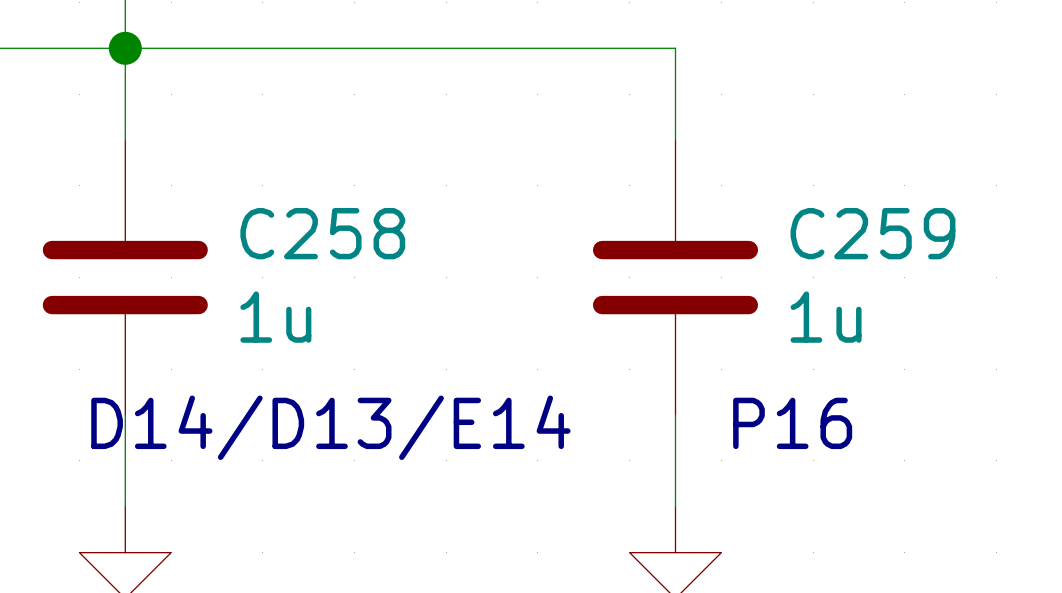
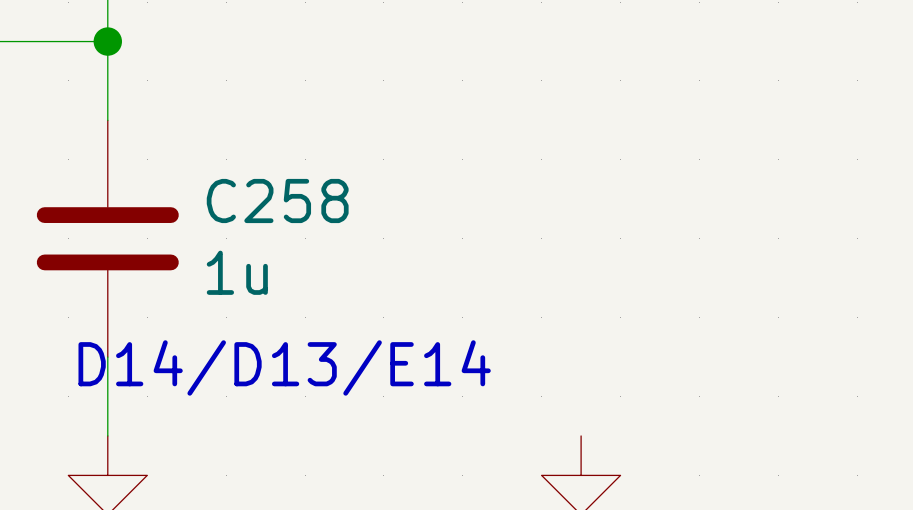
wire: (125, 48) (675, 48) (675, 140) -> none
C259: 1u (675, 277) -> none
wire: (675, 415) (675, 506) -> none
text: P16 (792, 423) -> none

